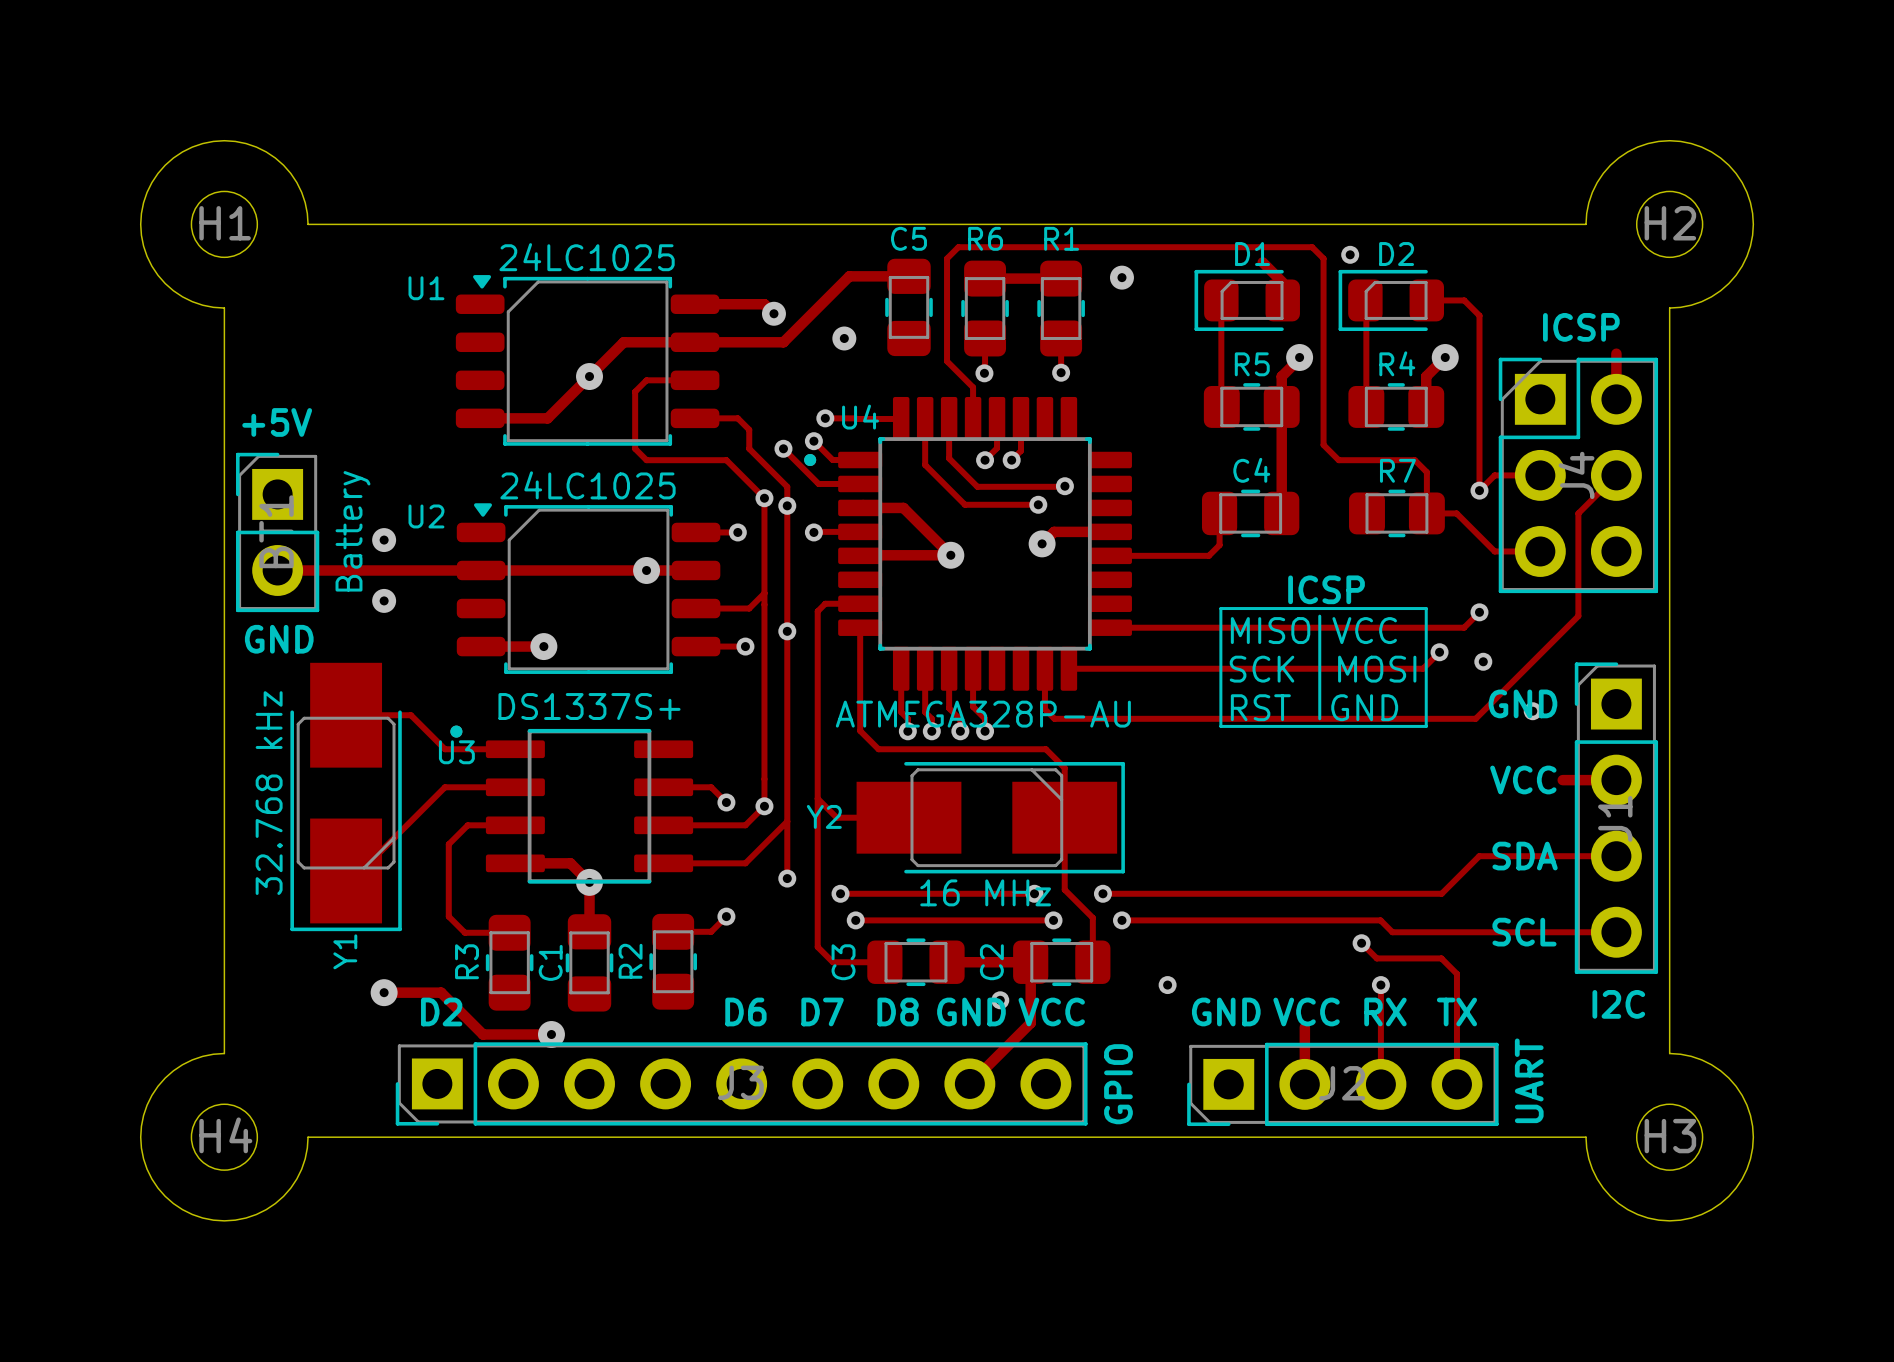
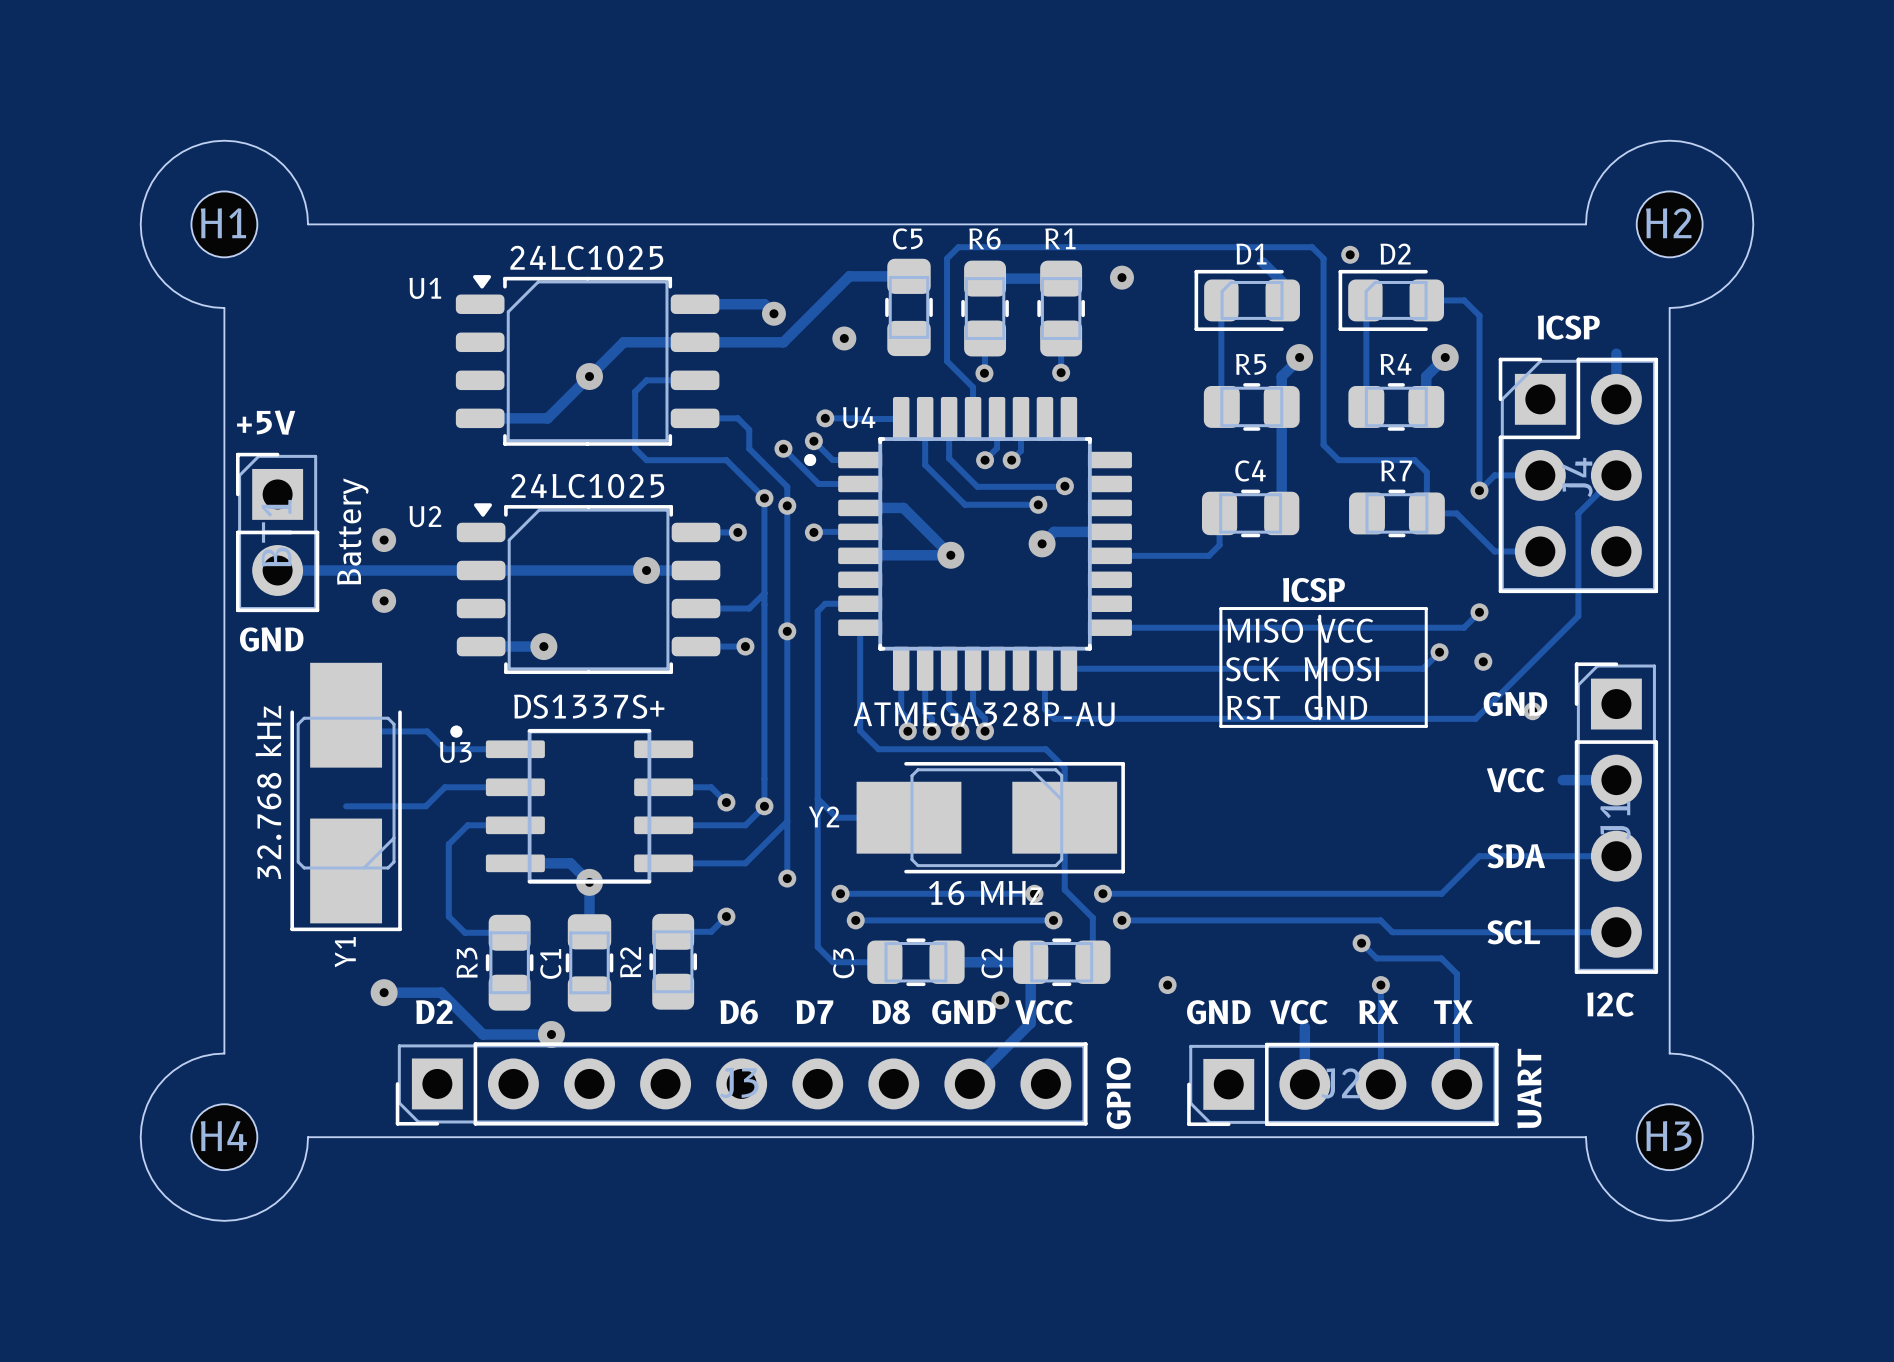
track: (346, 715) (410, 715) (427, 731) -> (346, 731) (427, 731)
track: (425, 806) (361, 870) (346, 870) -> (425, 806) (346, 806)

